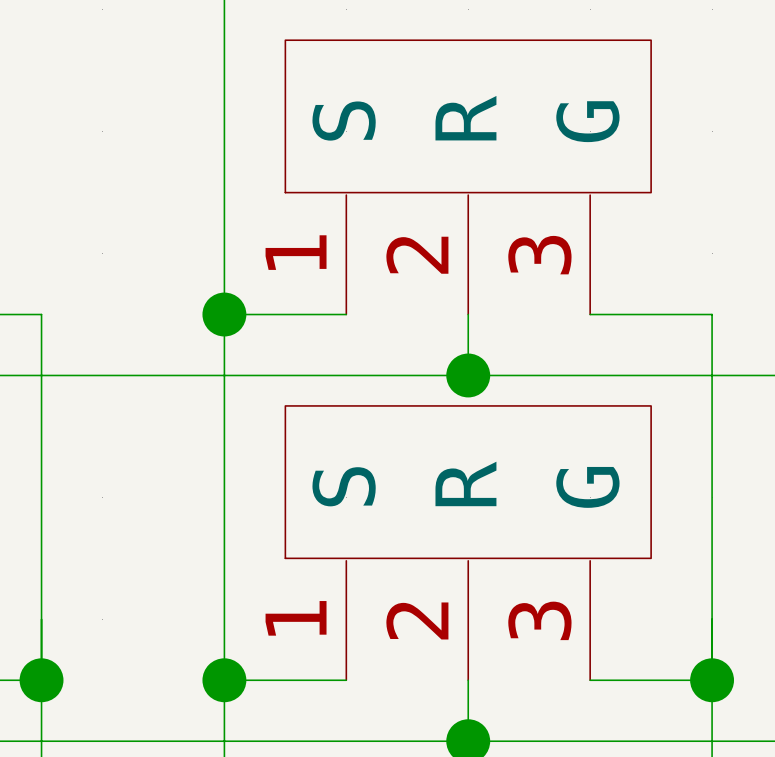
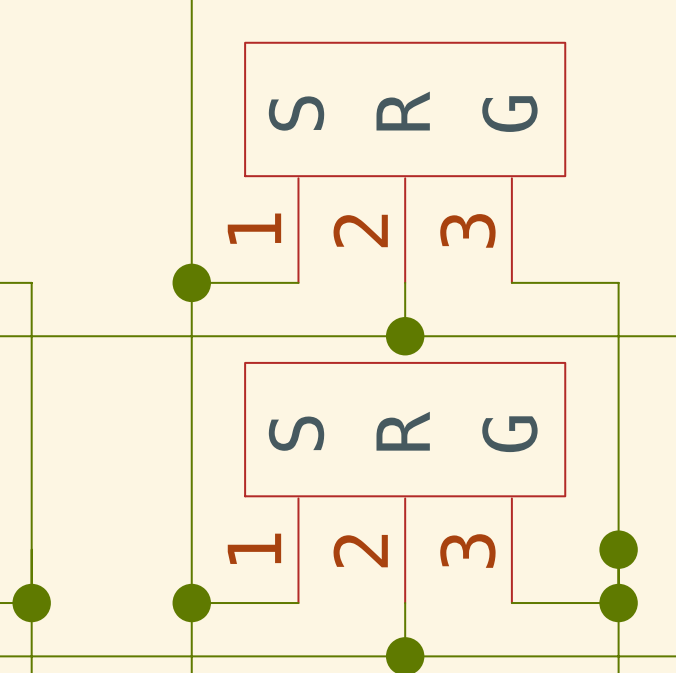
junction: none -> (618, 549)

